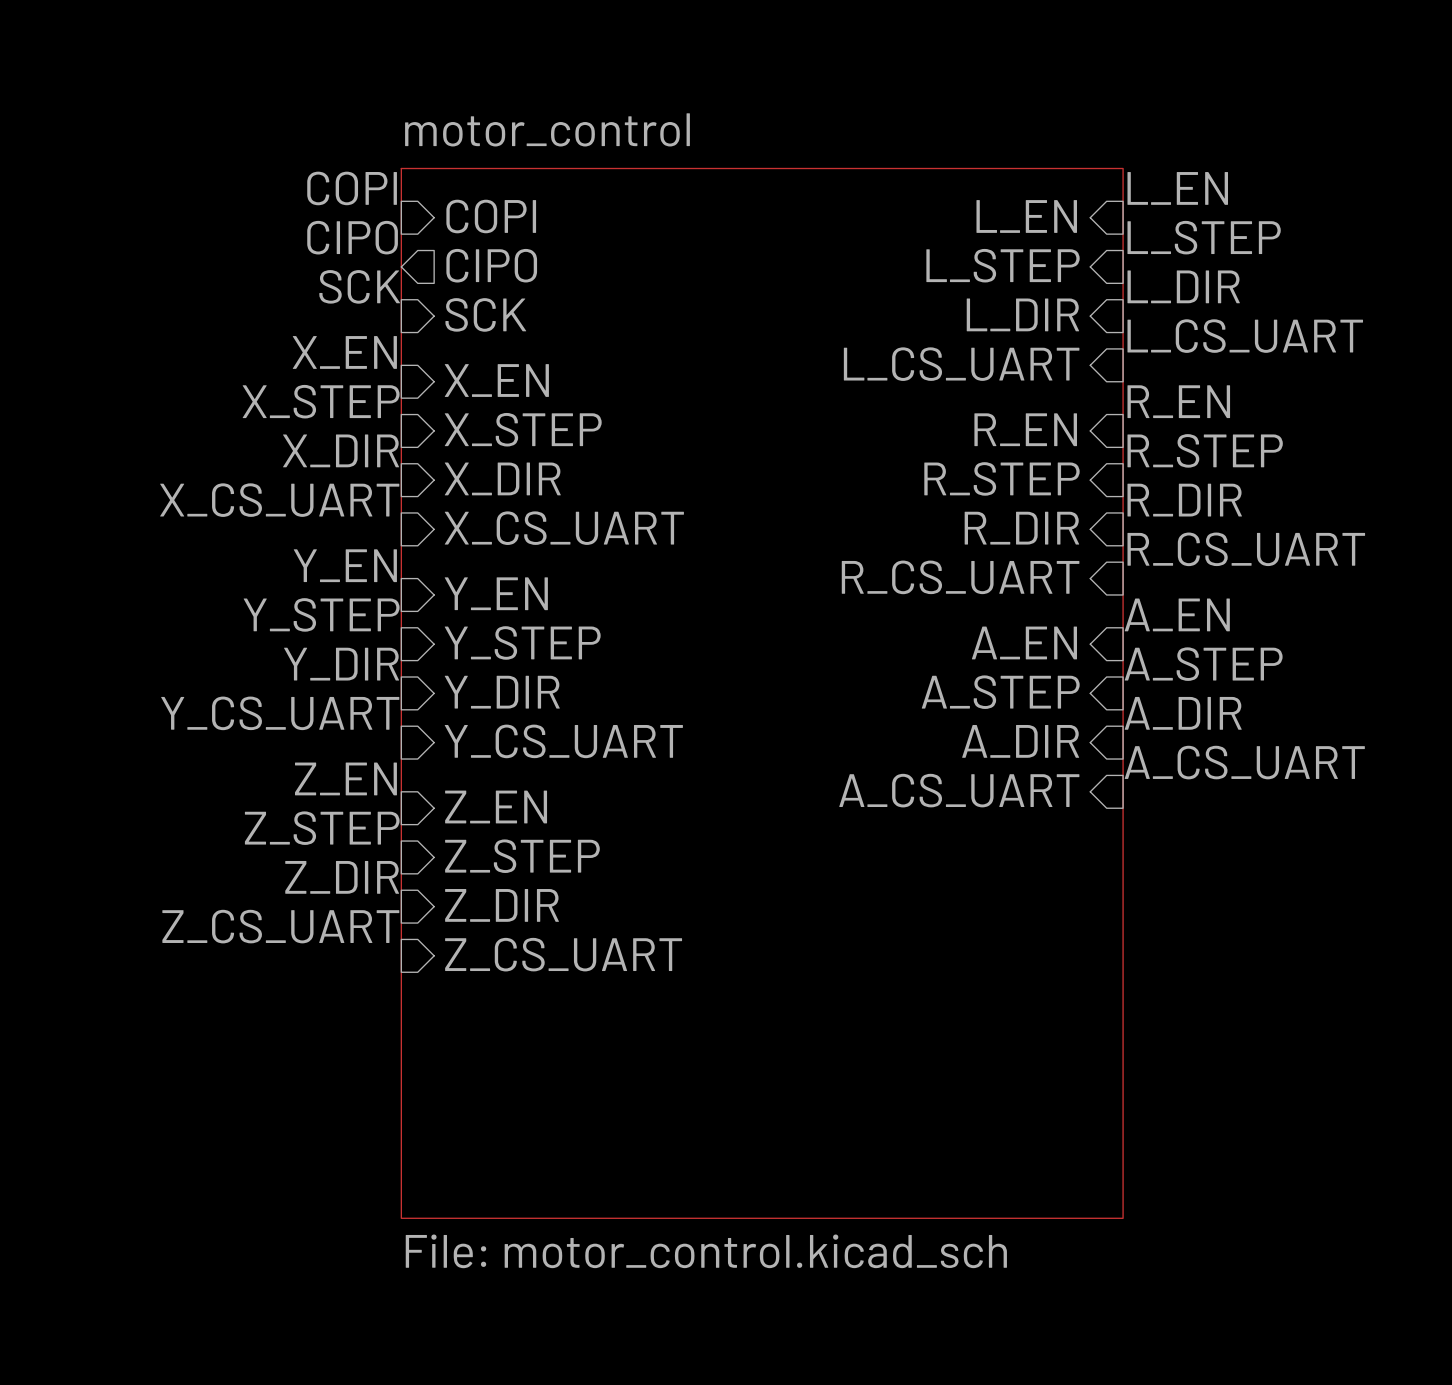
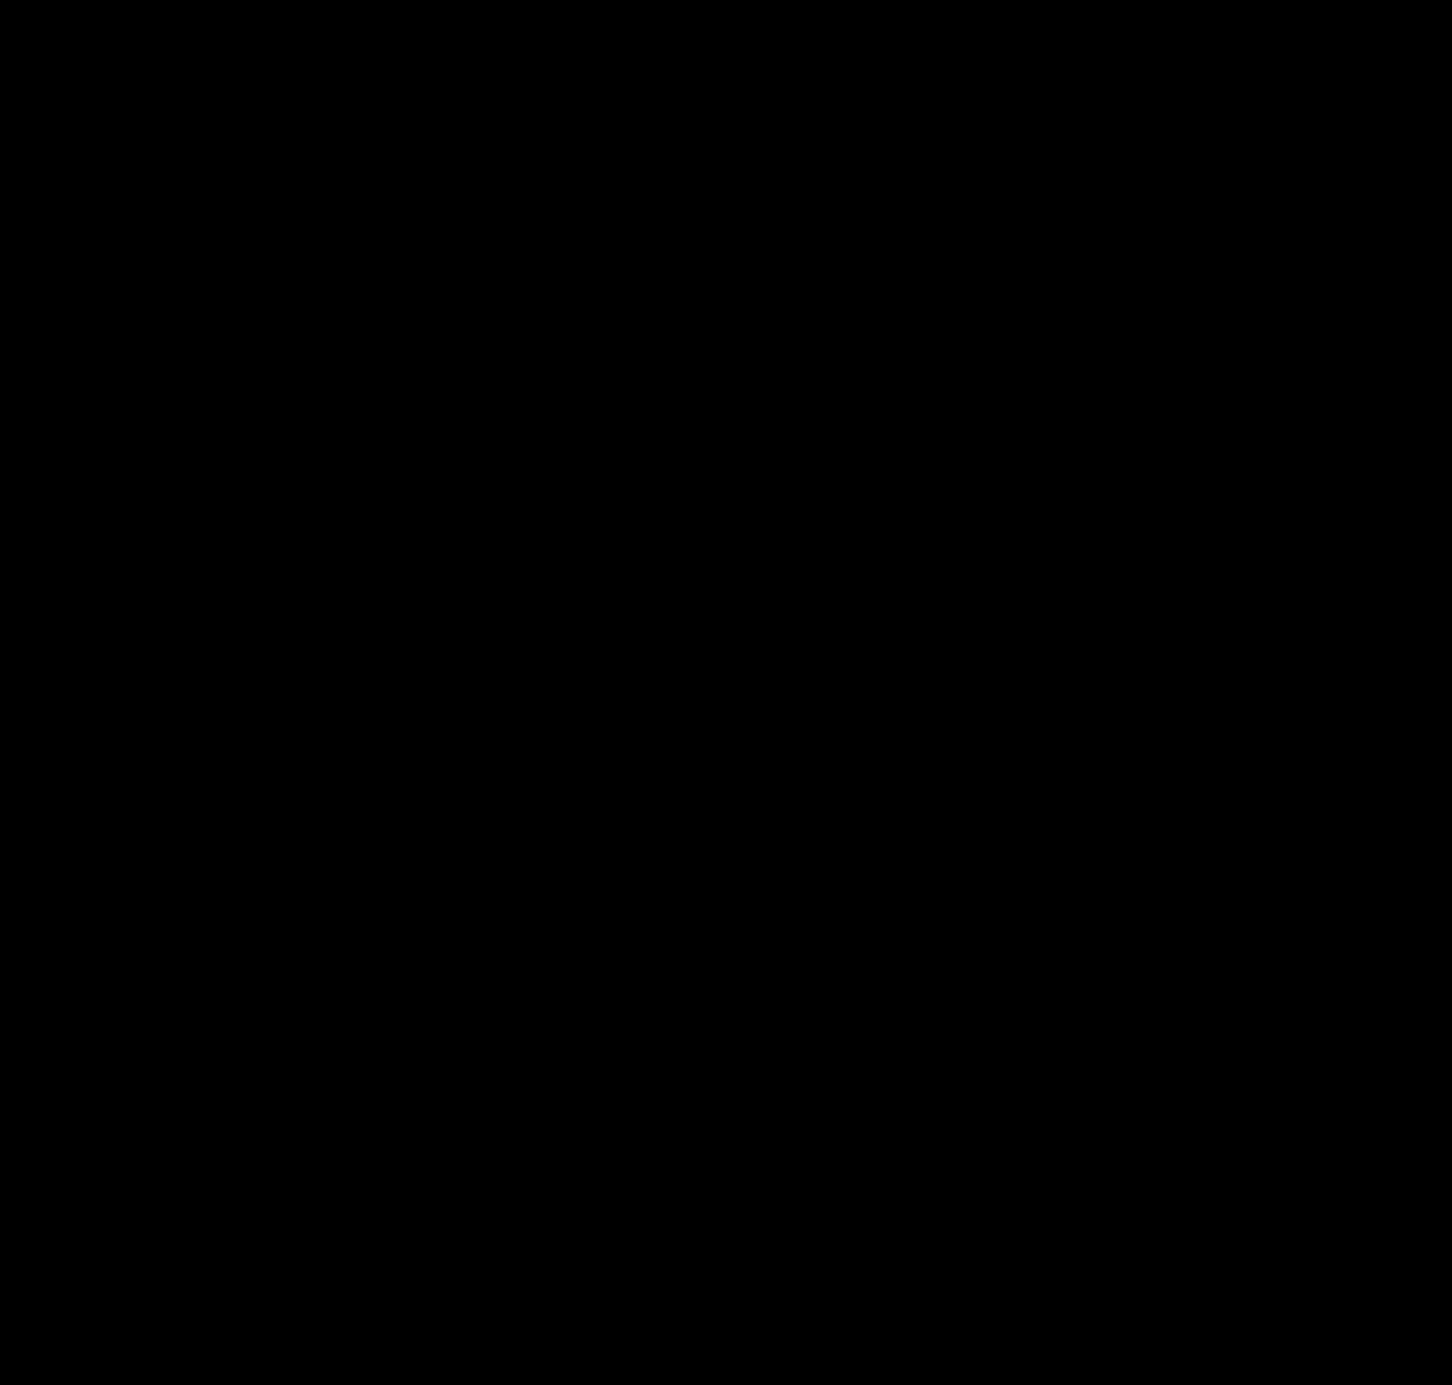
label: COPI (352, 188) -> none
label: L_EN (1177, 188) -> none
sheet pin: COPI (491, 216) -> none
sheet pin: L_EN (1026, 216) -> none
label: CIPO (352, 237) -> none
label: L_STEP (1204, 237) -> none
sheet pin: CIPO (491, 265) -> none
sheet pin: L_STEP (1003, 265) -> none
label: SCK (359, 286) -> none
label: L_DIR (1183, 286) -> none
sheet pin: SCK (485, 314) -> none
sheet pin: L_DIR (1022, 314) -> none
label: L_CS_UART (1245, 336) -> none
label: X_EN (344, 352) -> none
sheet pin: L_CS_UART (961, 364) -> none
sheet pin: X_EN (496, 380) -> none
label: X_STEP (321, 401) -> none
label: R_EN (1178, 401) -> none
sheet pin: X_STEP (523, 429) -> none
sheet pin: R_EN (1025, 429) -> none
label: X_DIR (341, 450) -> none
label: R_STEP (1205, 450) -> none
sheet pin: X_DIR (502, 478) -> none
sheet pin: R_STEP (1001, 478) -> none
label: X_CS_UART (279, 500) -> none
label: R_DIR (1184, 500) -> none
sheet pin: X_CS_UART (564, 528) -> none
sheet pin: R_DIR (1021, 528) -> none
label: R_CS_UART (1246, 549) -> none
label: Y_EN (345, 565) -> none
sheet pin: R_CS_UART (960, 577) -> none
sheet pin: Y_EN (496, 593) -> none
label: Y_STEP (321, 614) -> none
label: A_EN (1177, 614) -> none
sheet pin: Y_STEP (522, 642) -> none
sheet pin: A_EN (1024, 642) -> none
label: Y_DIR (341, 664) -> none
label: A_STEP (1203, 664) -> none
sheet pin: Y_DIR (502, 692) -> none
sheet pin: A_STEP (1000, 692) -> none
sheet motor_control: File: motor_control.kicad_sch (762, 693) -> none
label: Y_CS_UART (280, 713) -> none
label: A_DIR (1183, 713) -> none
sheet pin: Y_CS_UART (563, 741) -> none
sheet pin: A_DIR (1020, 741) -> none
label: A_CS_UART (1244, 762) -> none
label: Z_EN (345, 778) -> none
sheet pin: A_CS_UART (959, 790) -> none
sheet pin: Z_EN (496, 807) -> none
label: Z_STEP (322, 828) -> none
sheet pin: Z_STEP (522, 856) -> none
label: Z_DIR (342, 877) -> none
sheet pin: Z_DIR (502, 905) -> none
label: Z_CS_UART (280, 926) -> none
sheet pin: Z_CS_UART (563, 954) -> none

